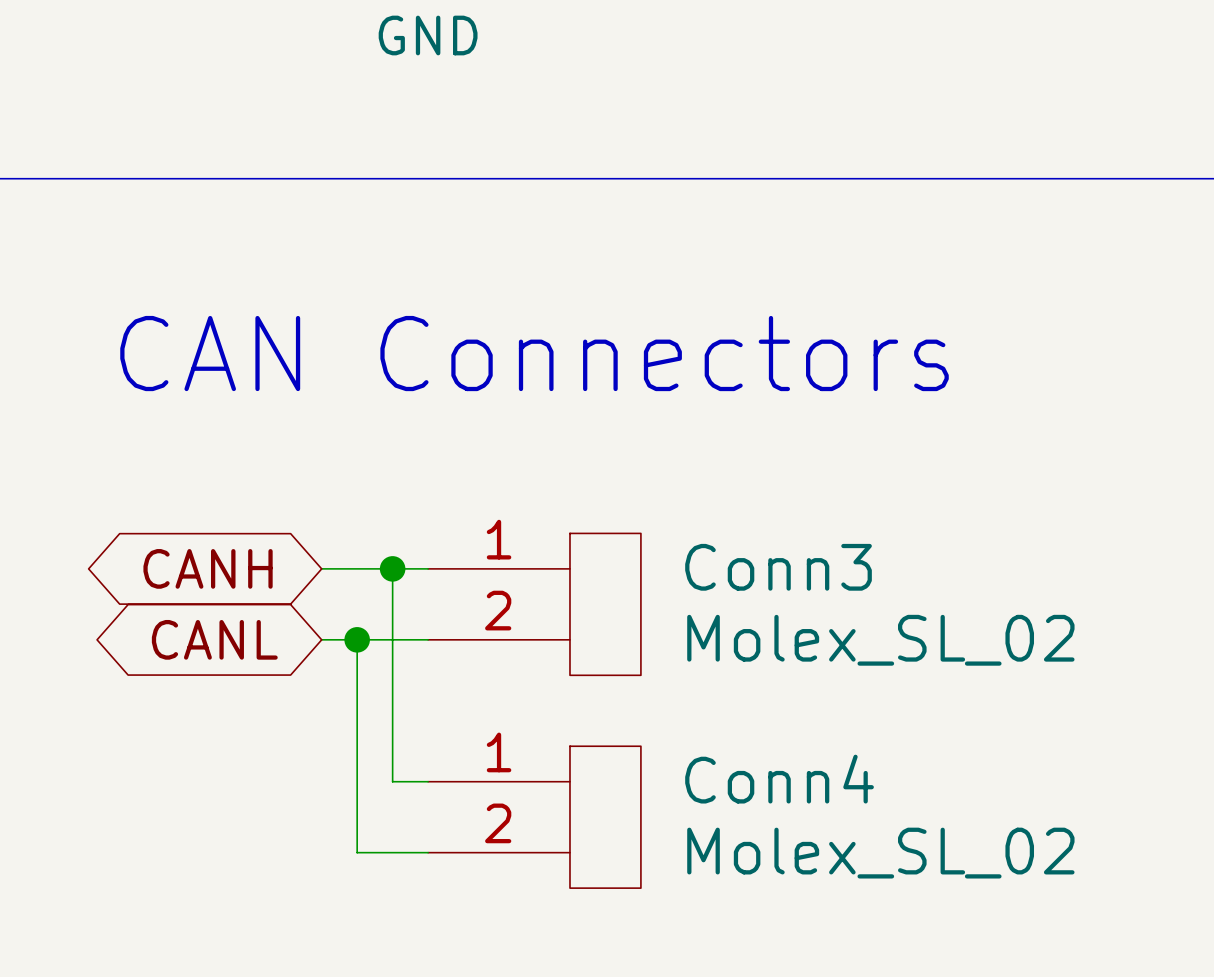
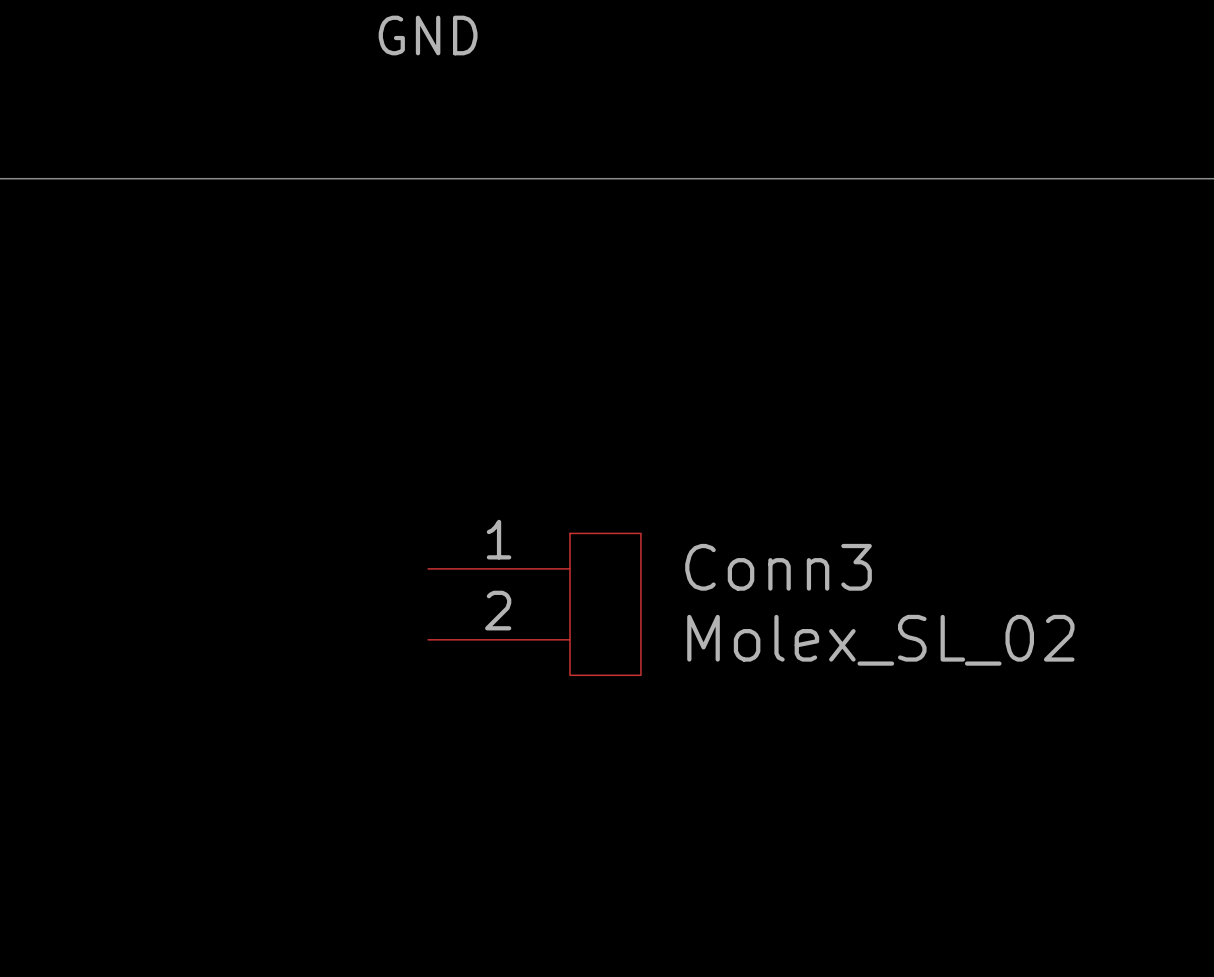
text: CAN Connectors (534, 353) -> none
global label: CANH (208, 568) -> none
wire: (321, 568) (428, 568) -> none
wire: (392, 568) (392, 781) (428, 781) -> none
junction: (392, 568) -> none
global label: CANL (214, 639) -> none
wire: (321, 639) (428, 639) -> none
wire: (357, 639) (357, 852) (428, 852) -> none
junction: (357, 639) -> none
Conn4: Molex_SL_02 (534, 817) -> none

